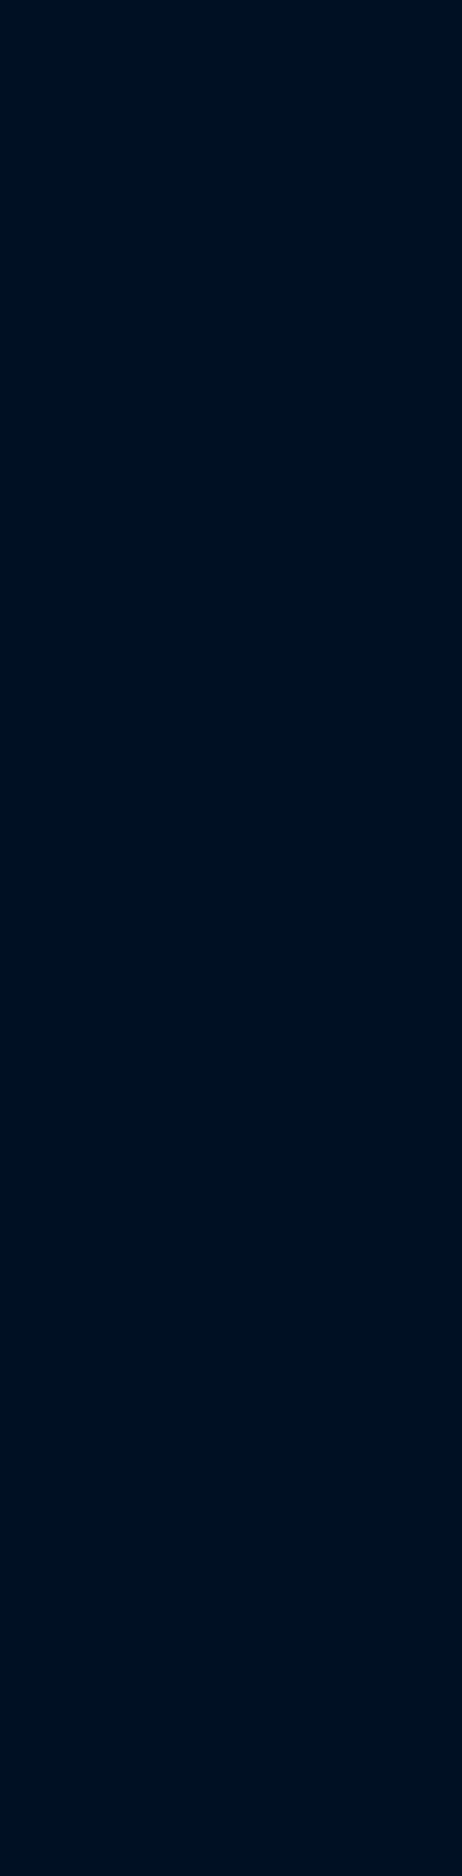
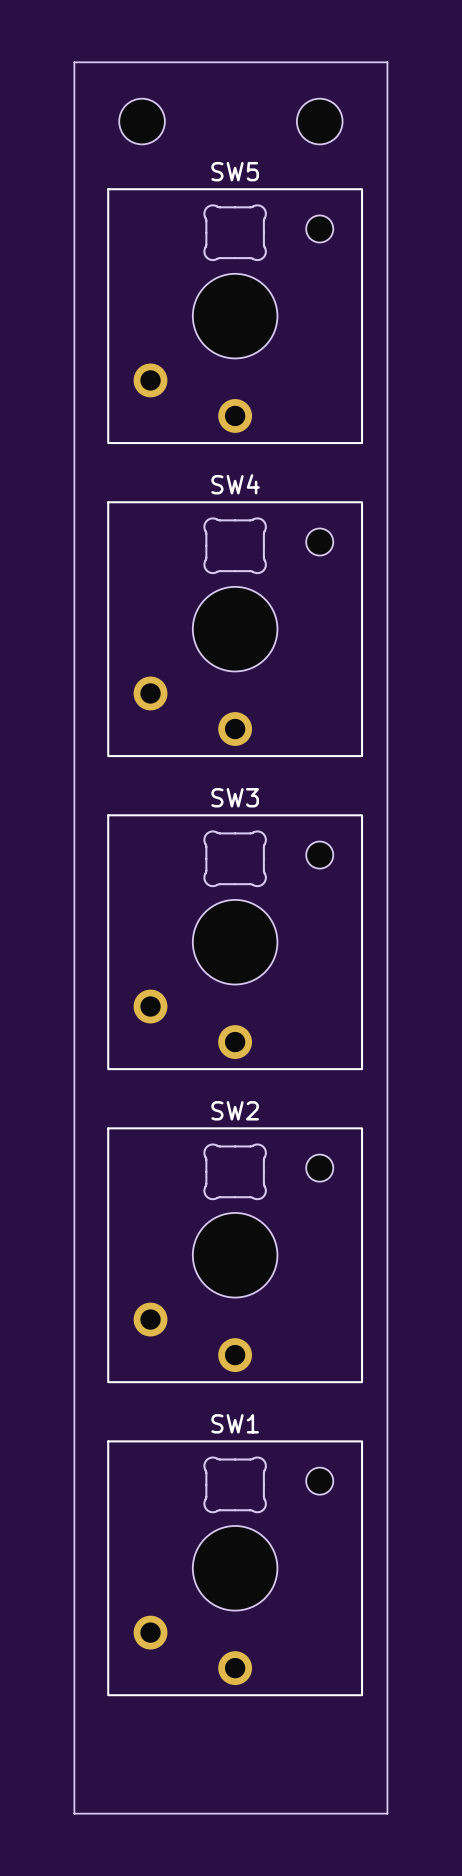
board edge: none -> (74, 62) (387, 62) (387, 1813) (74, 1813) (74, 62)
part: none -> (142, 121)
part: none -> (319, 121)
part: none -> (235, 232)
SW5: none -> (235, 316)
part: none -> (235, 545)
SW4: none -> (235, 629)
part: none -> (235, 858)
SW3: none -> (235, 942)
part: none -> (235, 1171)
SW2: none -> (235, 1255)
part: none -> (235, 1484)
SW1: none -> (235, 1568)

